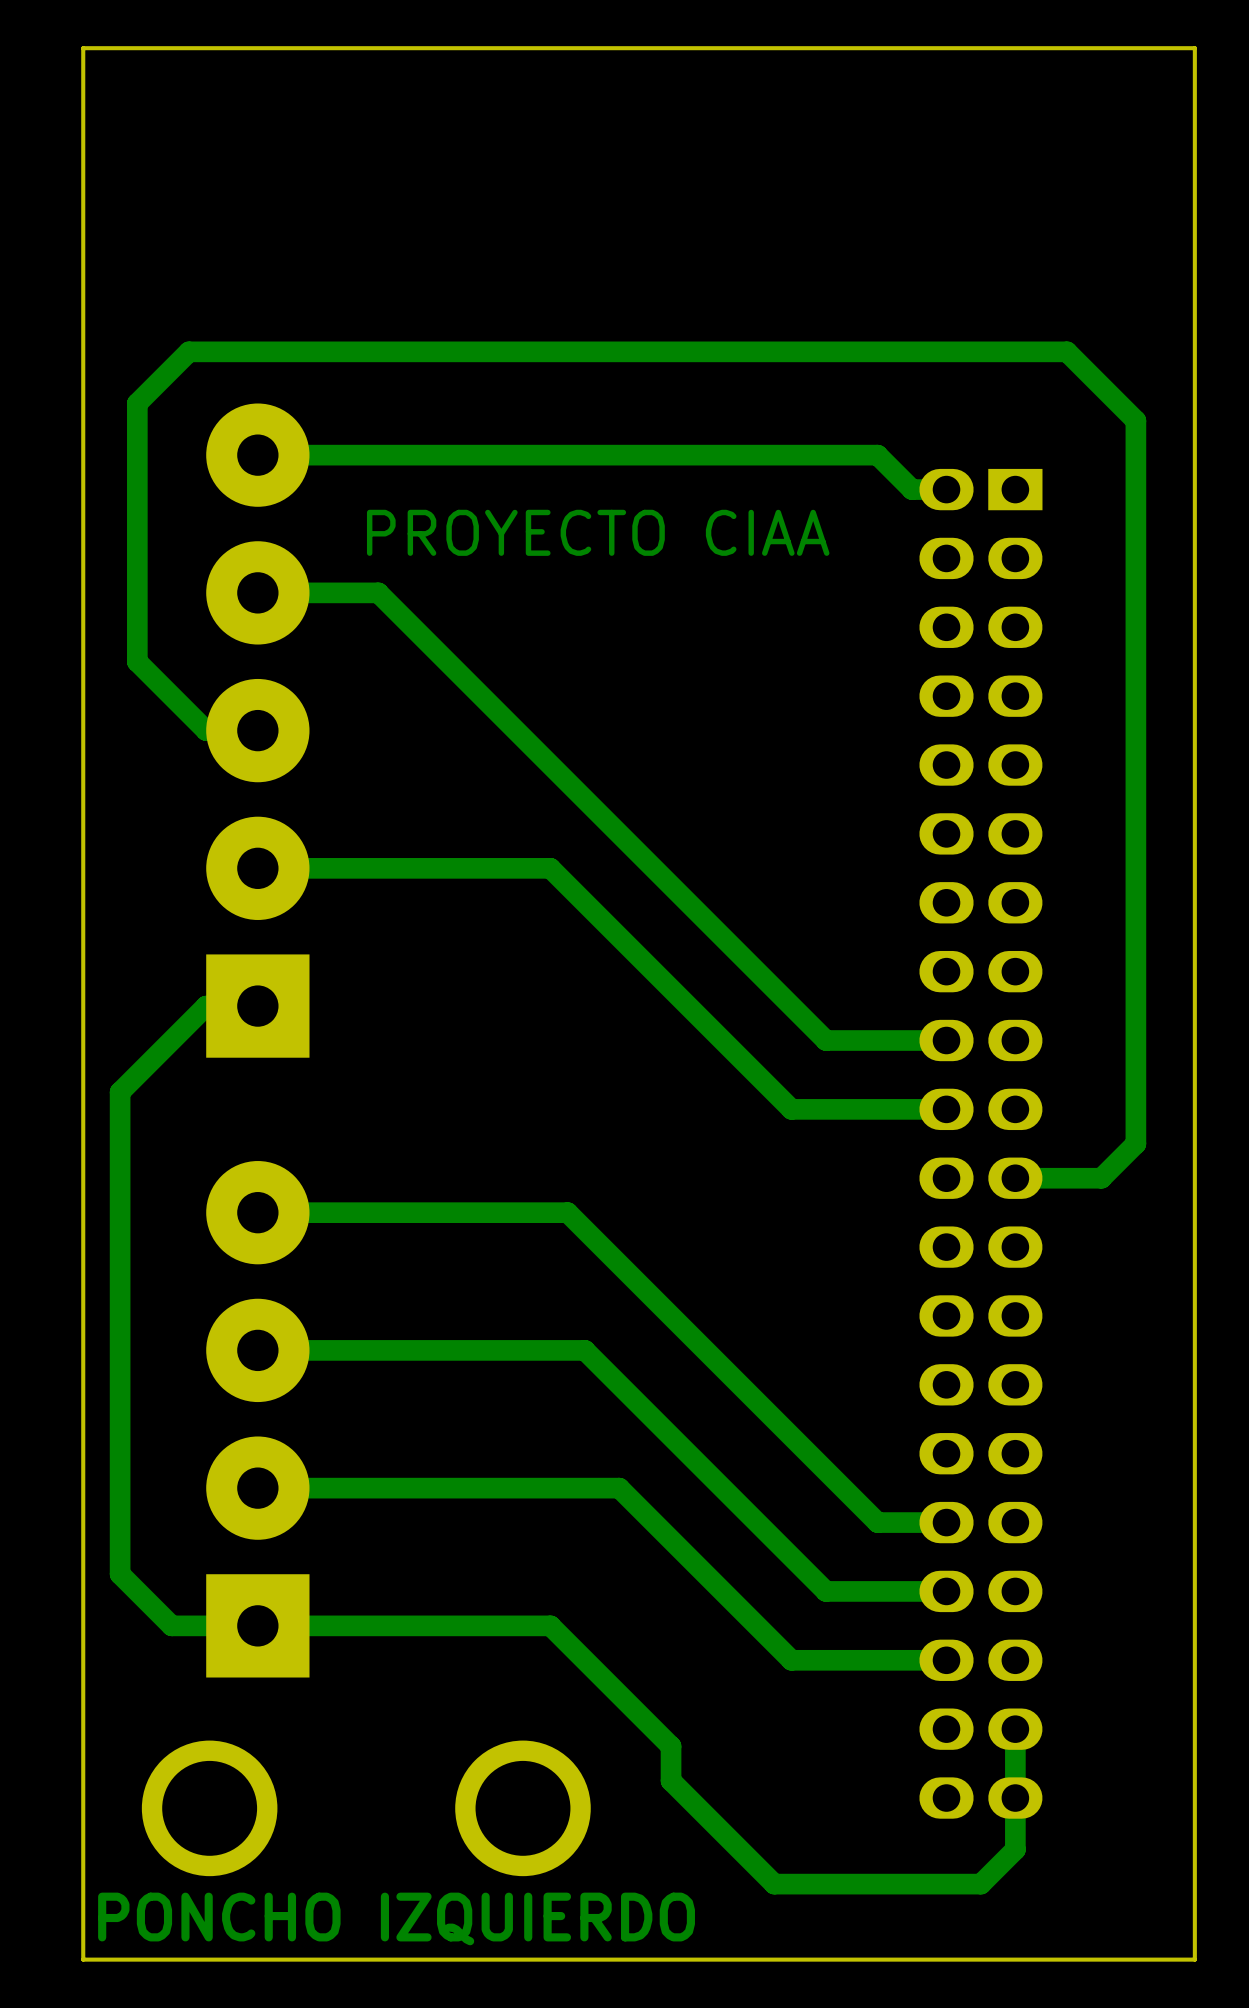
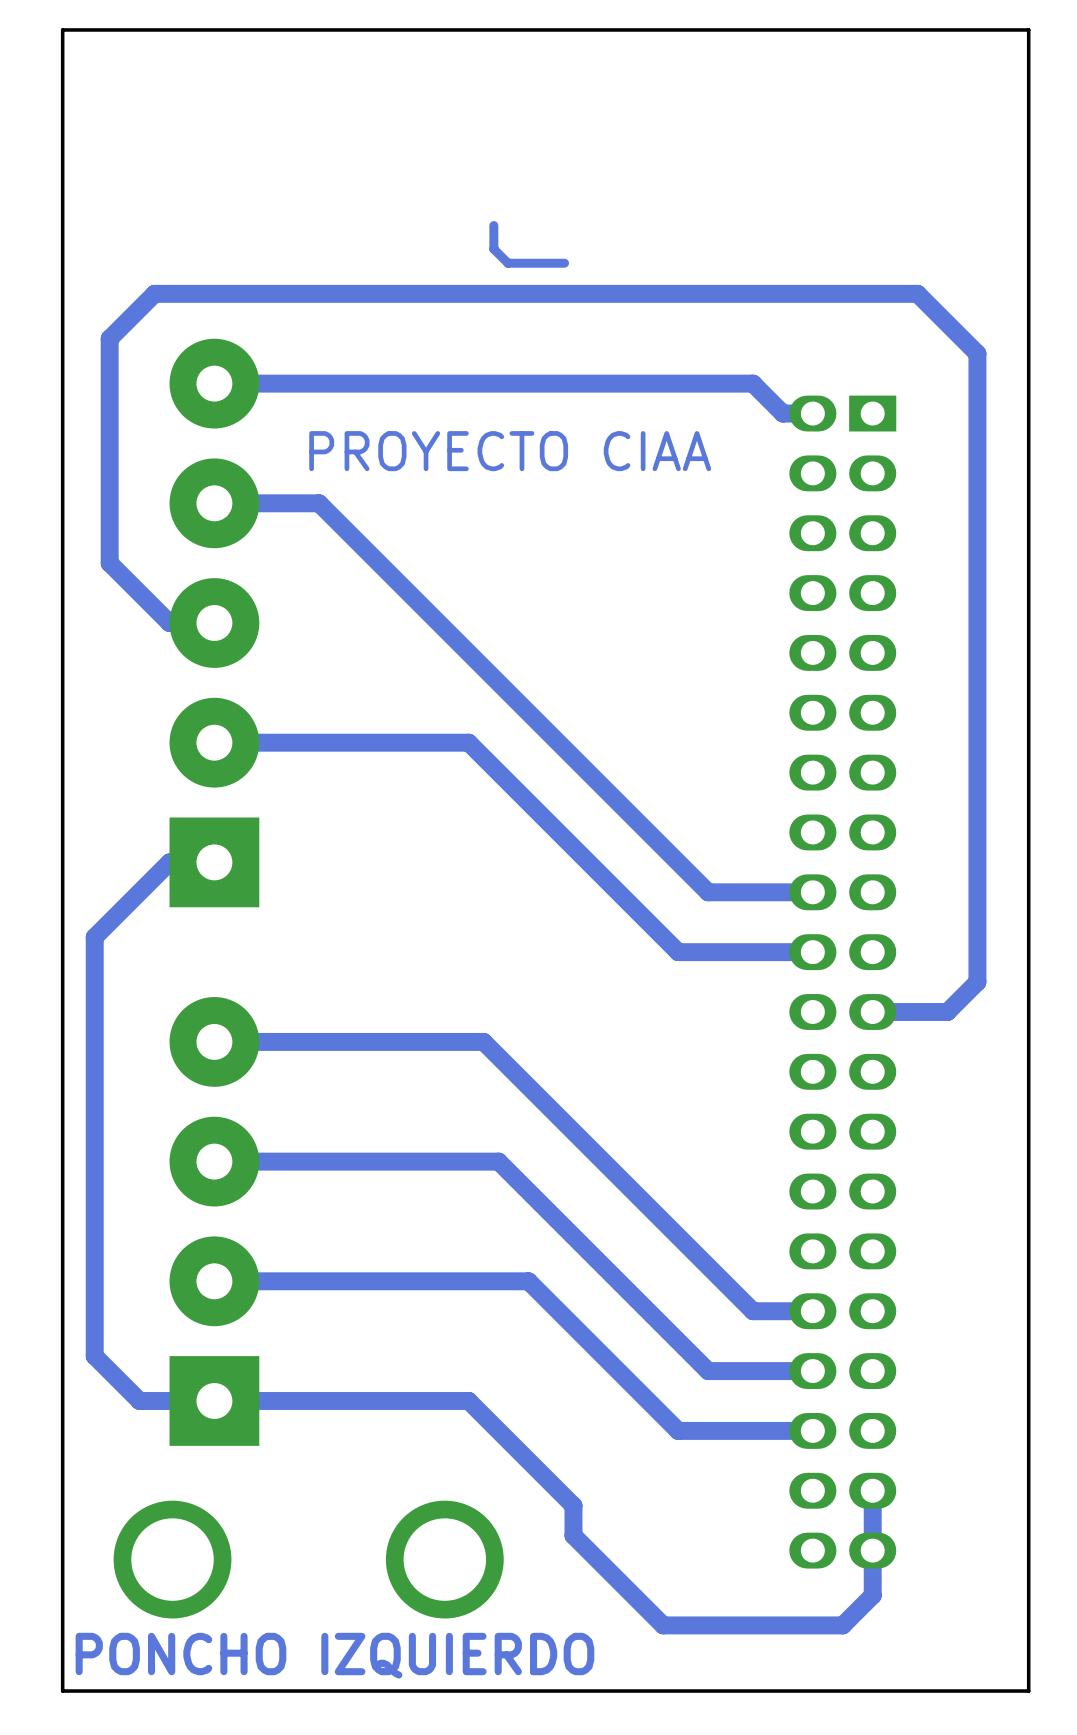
track: none -> (493, 225) (493, 249) (507, 263) (564, 263)

